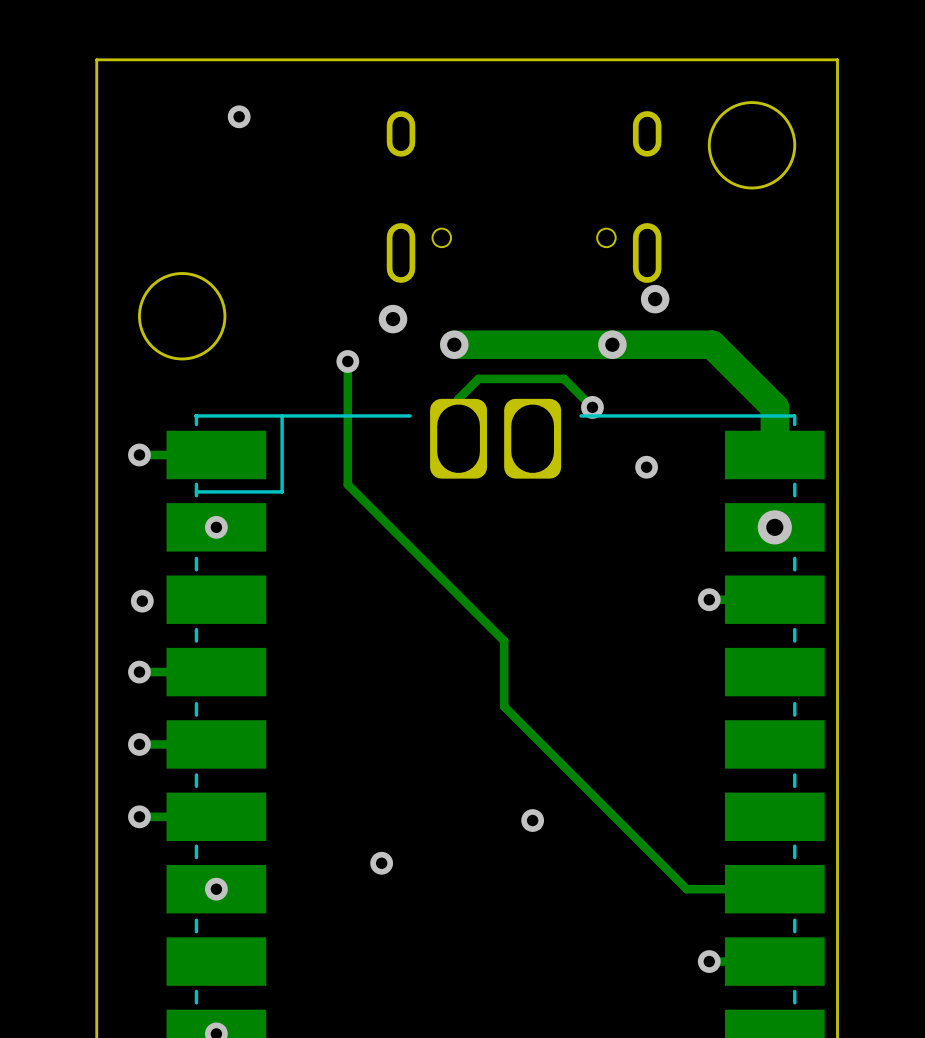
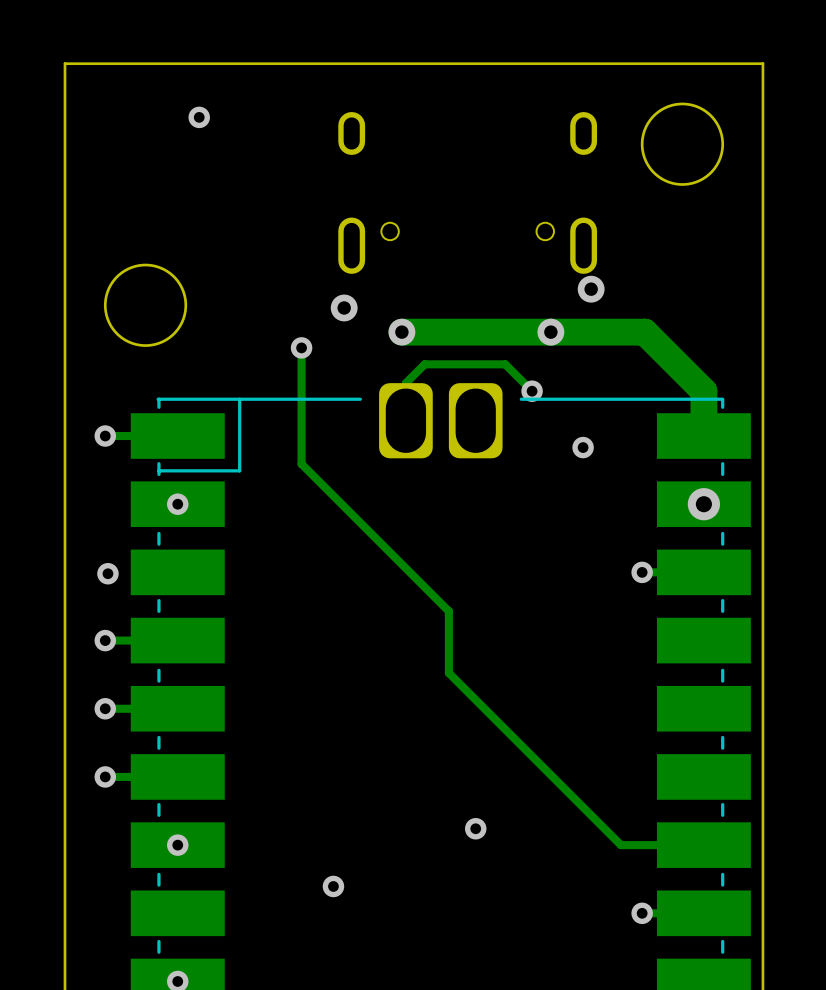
via position: (532, 820) -> (475, 828)
via position: (381, 863) -> (333, 886)

